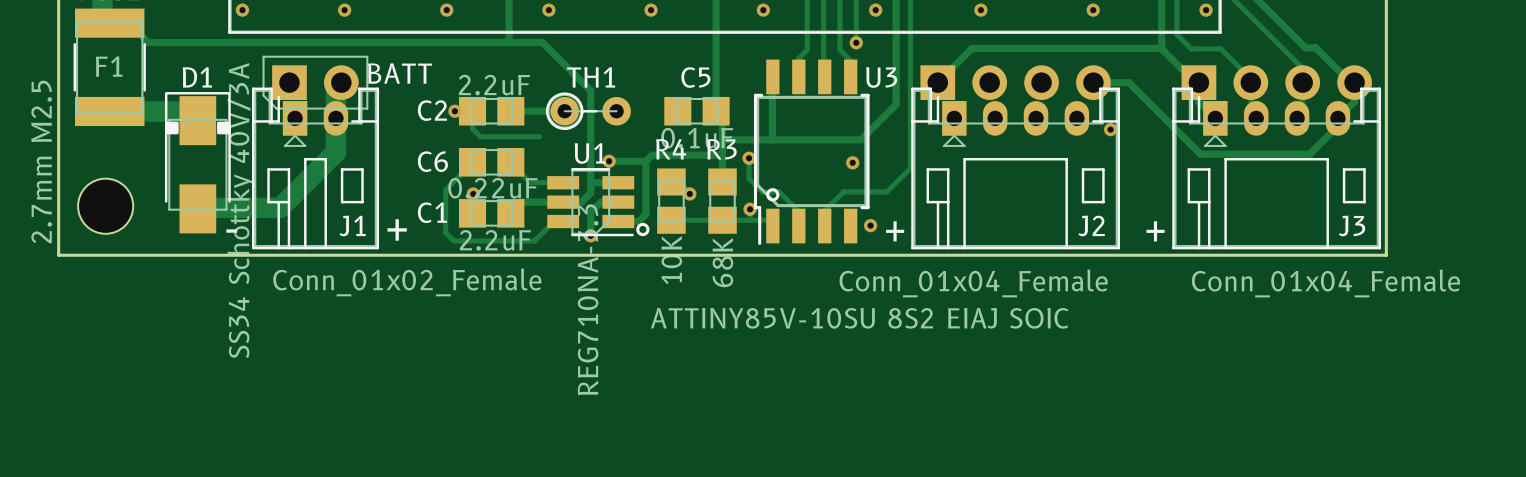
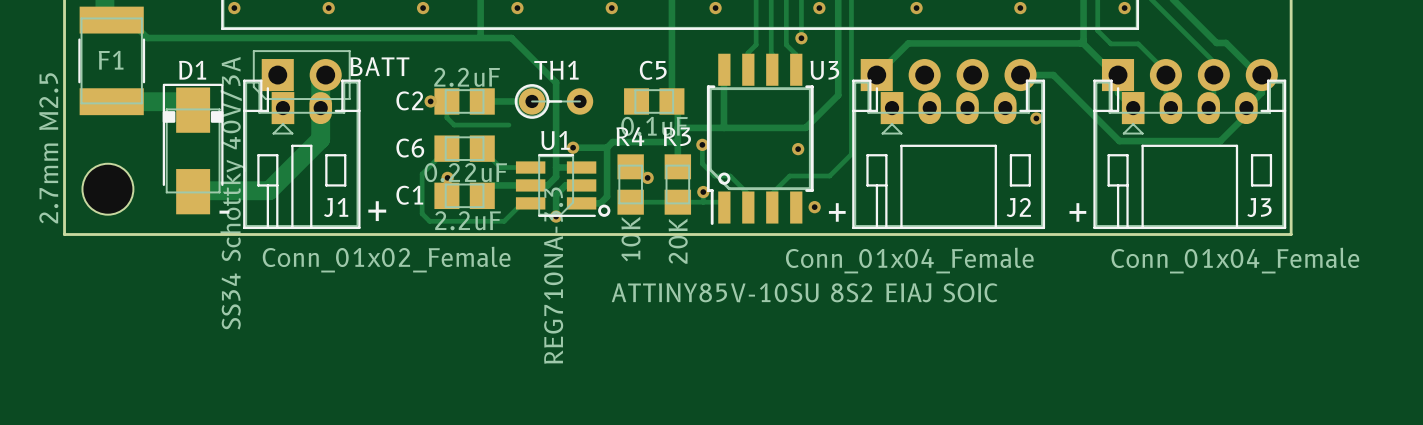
R3 value: 68K (722, 262) -> 20K (678, 241)

